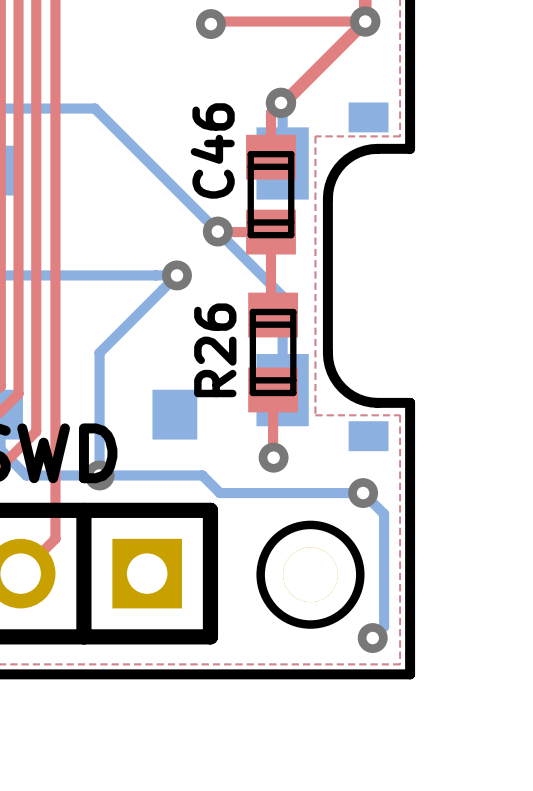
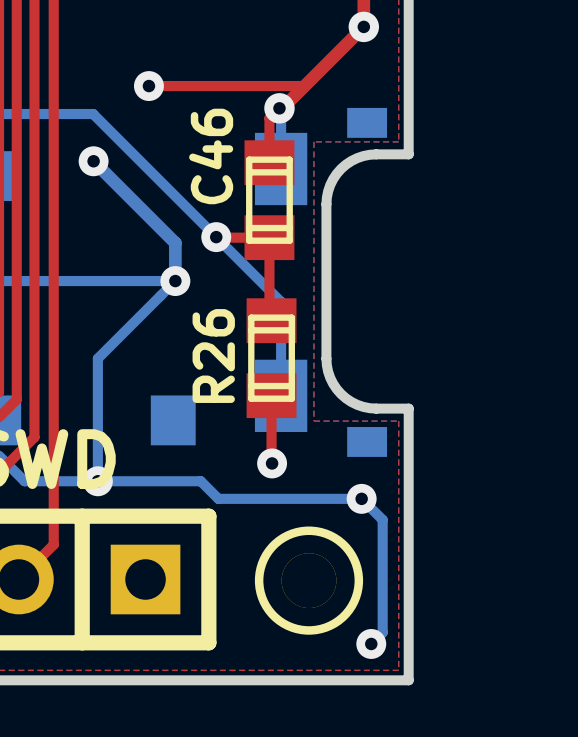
top track: (365, 21) (213, 21) (210, 24) -> (363, 26) (304, 86) (148, 86)
via: (210, 24) -> none
via: none -> (148, 86)
bottom track: none -> (93, 161) (175, 243) (175, 281)
via: none -> (93, 161)

